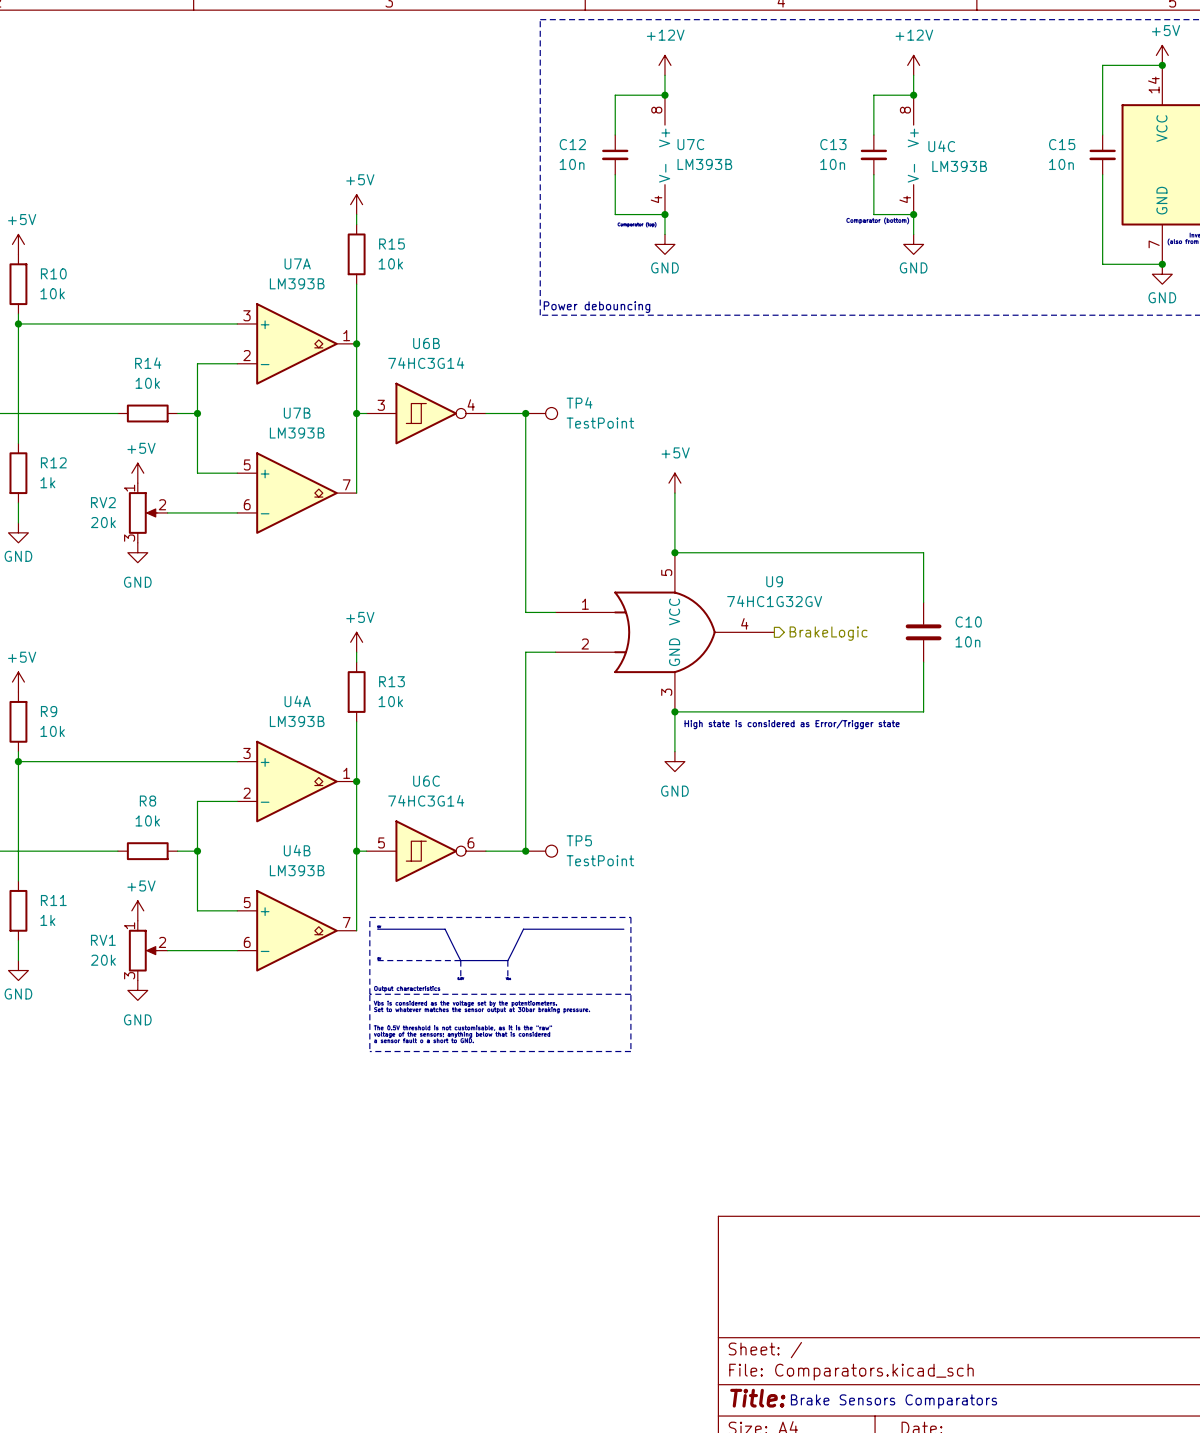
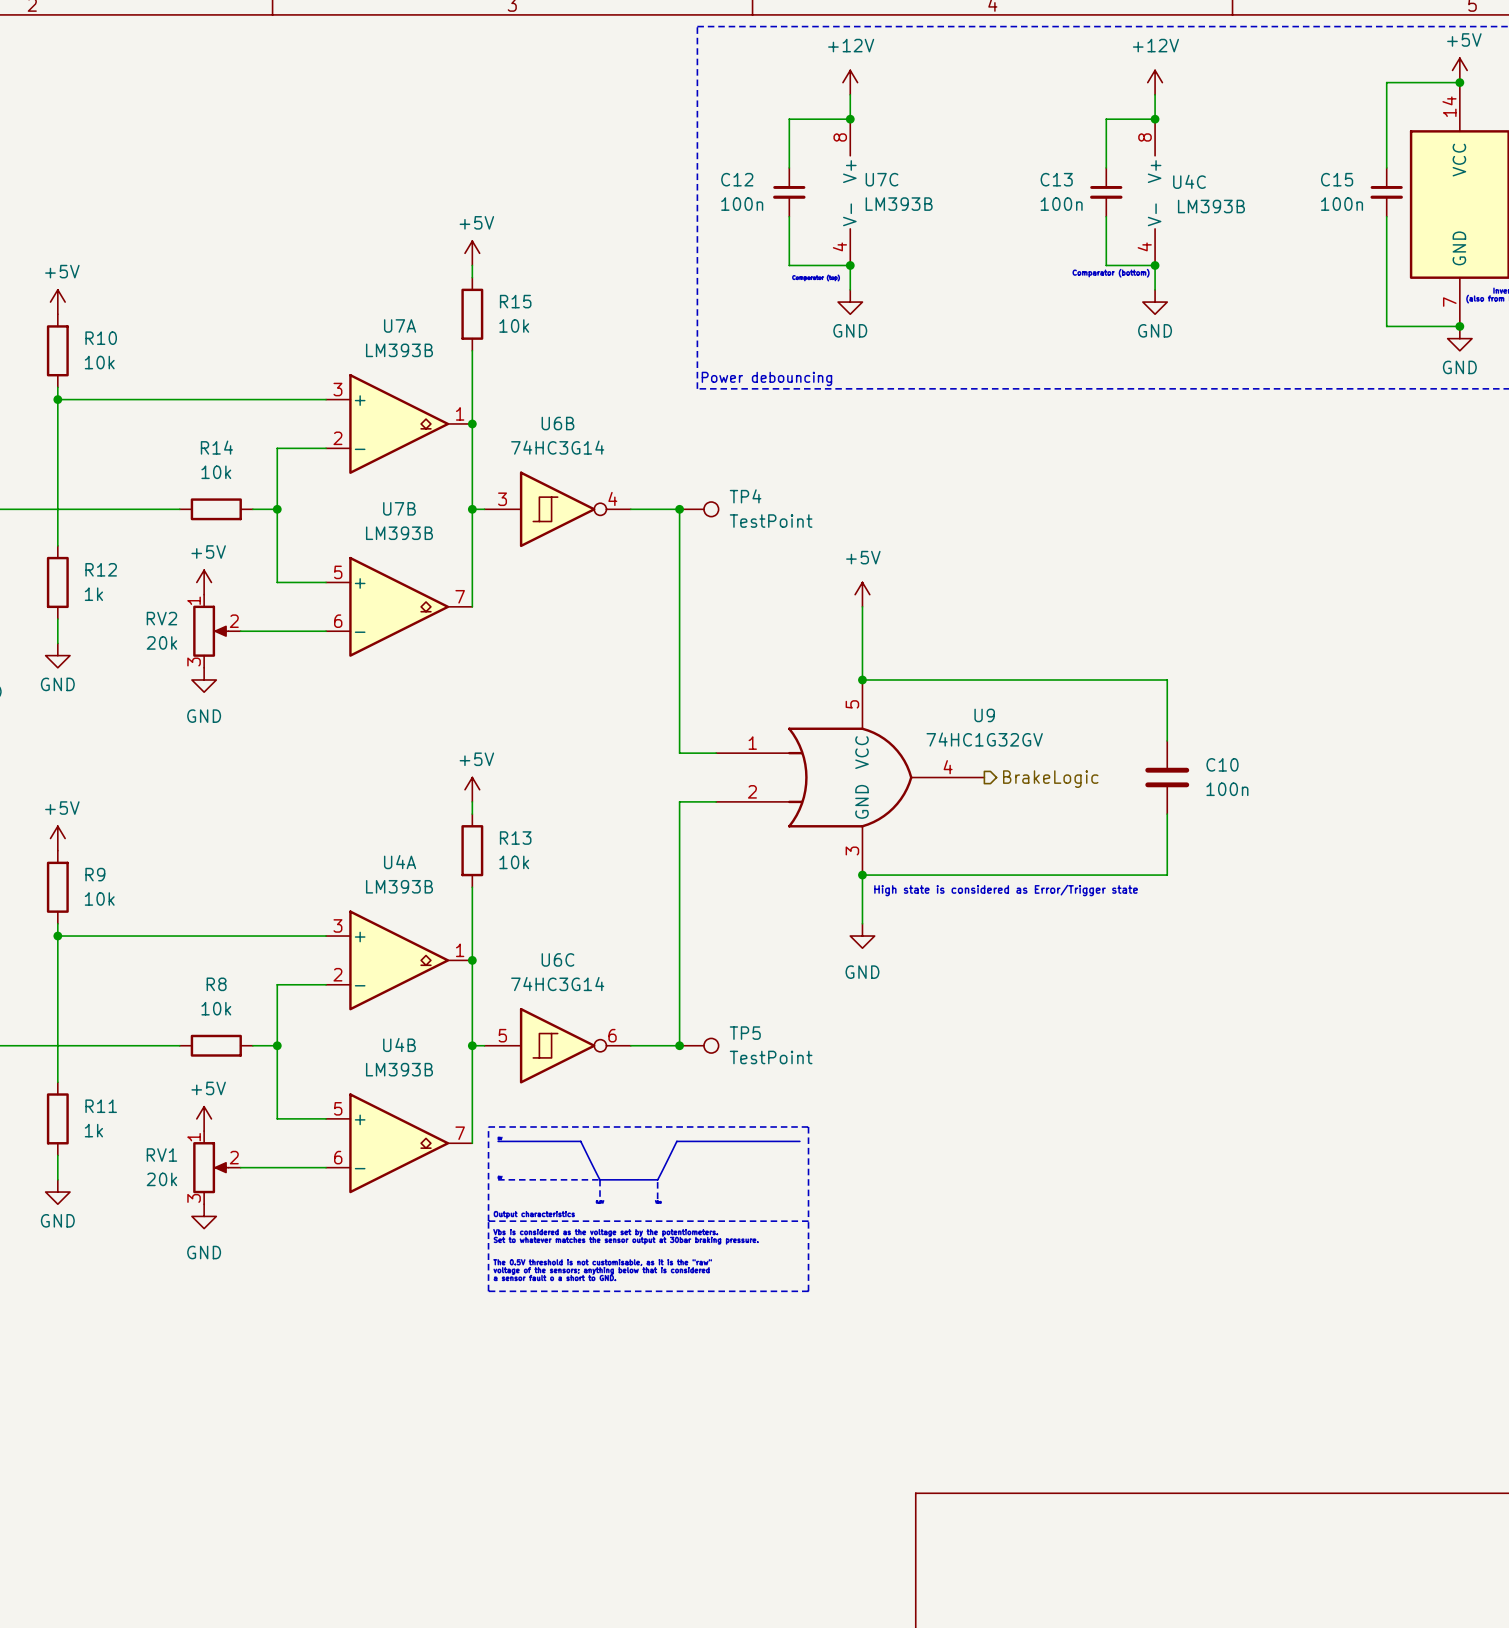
C12 value: 10n (572, 164) -> 100n (742, 204)
C13 value: 10n (832, 164) -> 100n (1061, 204)
C15 value: 10n (1061, 164) -> 100n (1342, 204)
C10 value: 10n (967, 641) -> 100n (1227, 789)

